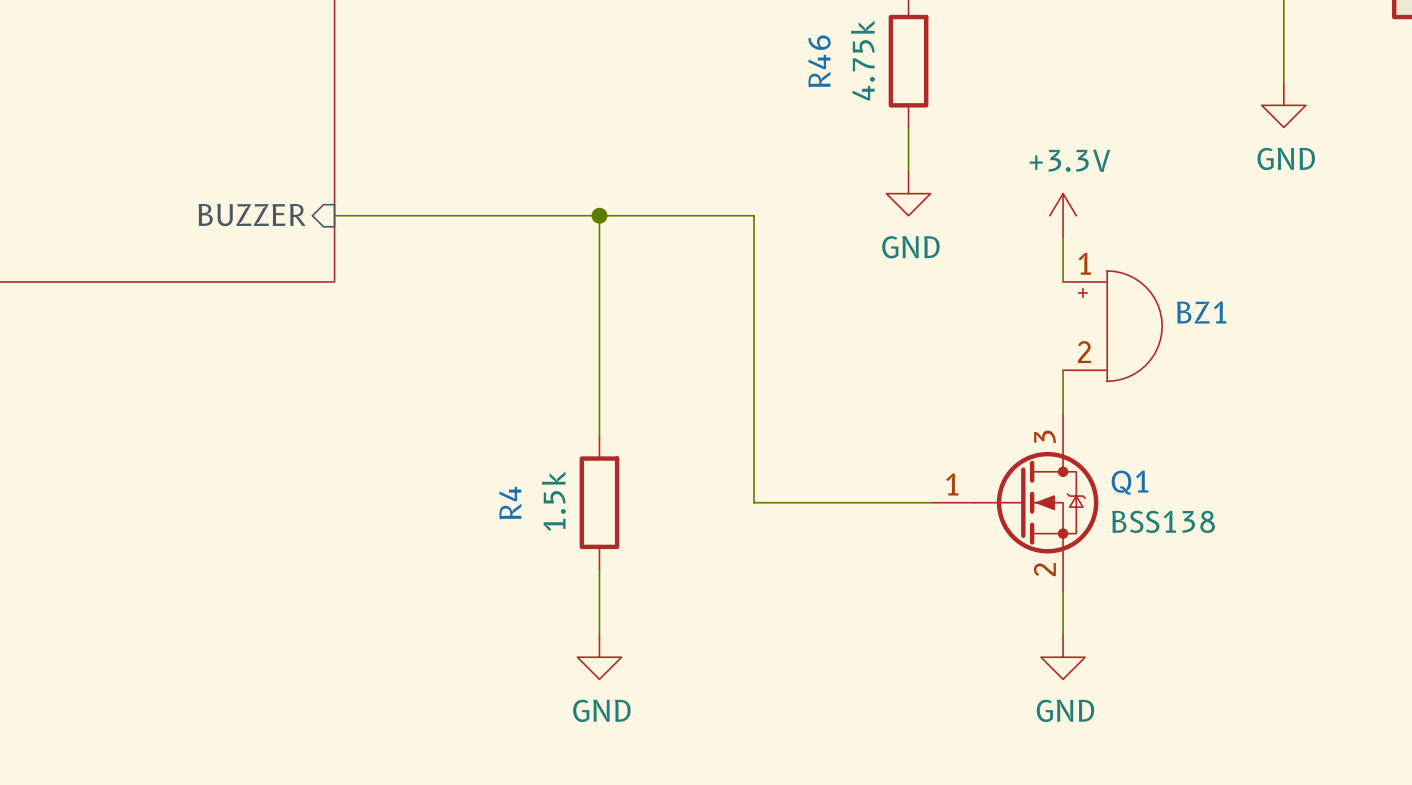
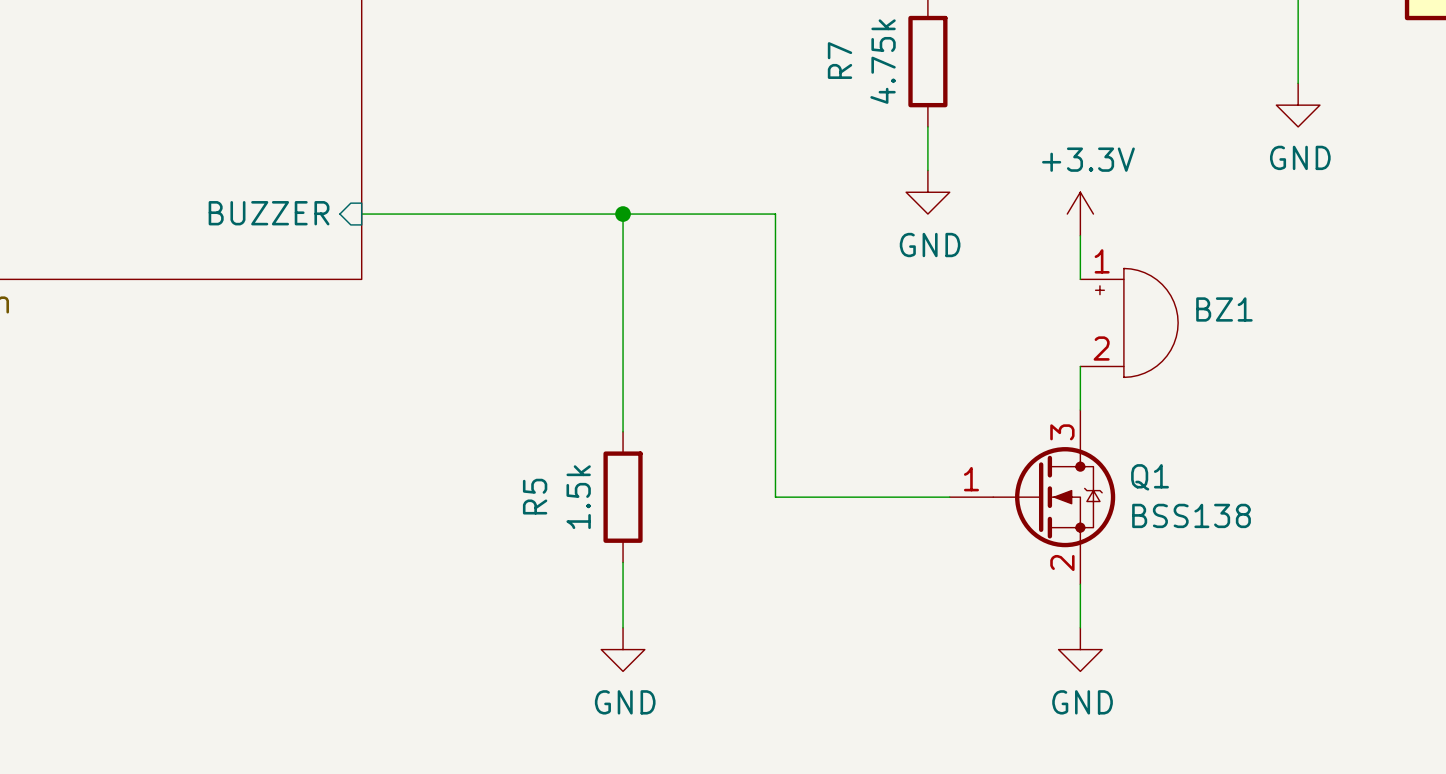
R46 name: R46 (819, 61) -> R7 (839, 60)
R4 name: R4 (510, 503) -> R5 (535, 496)

